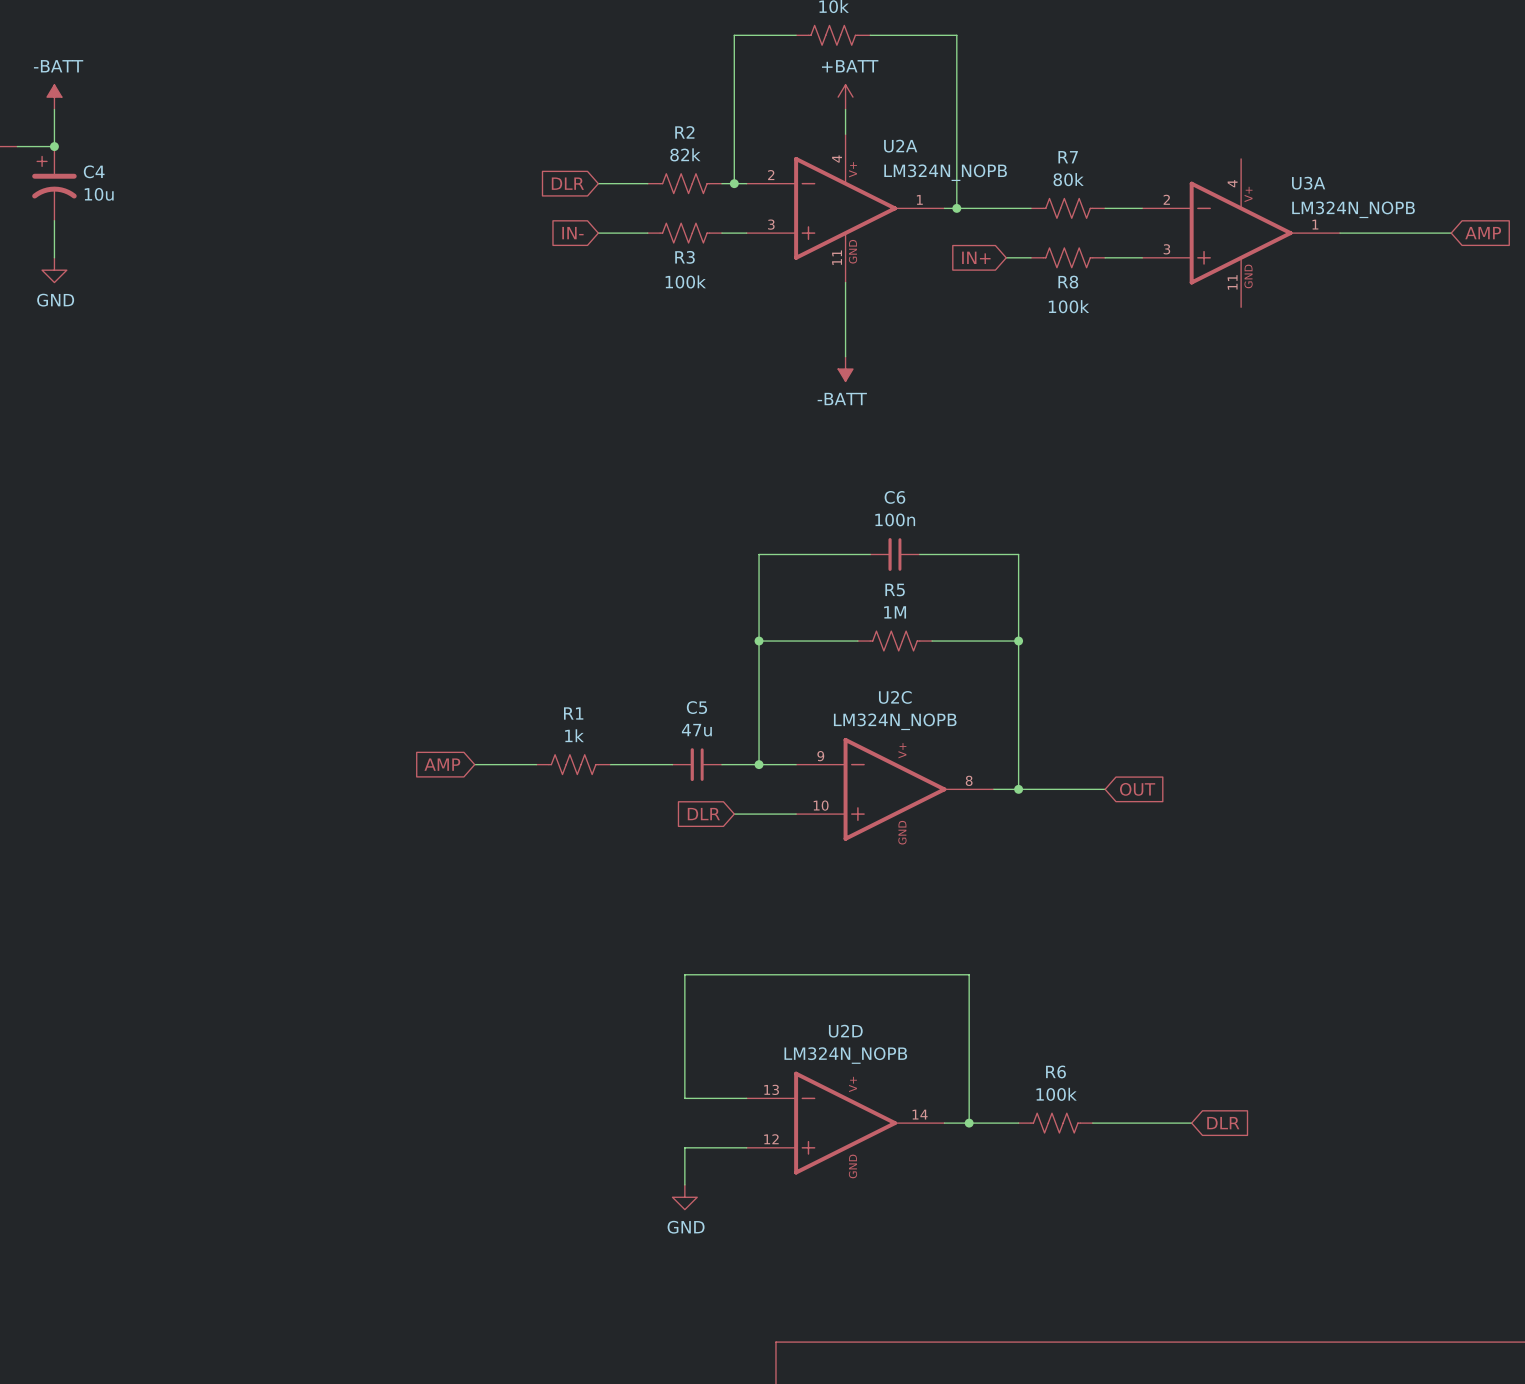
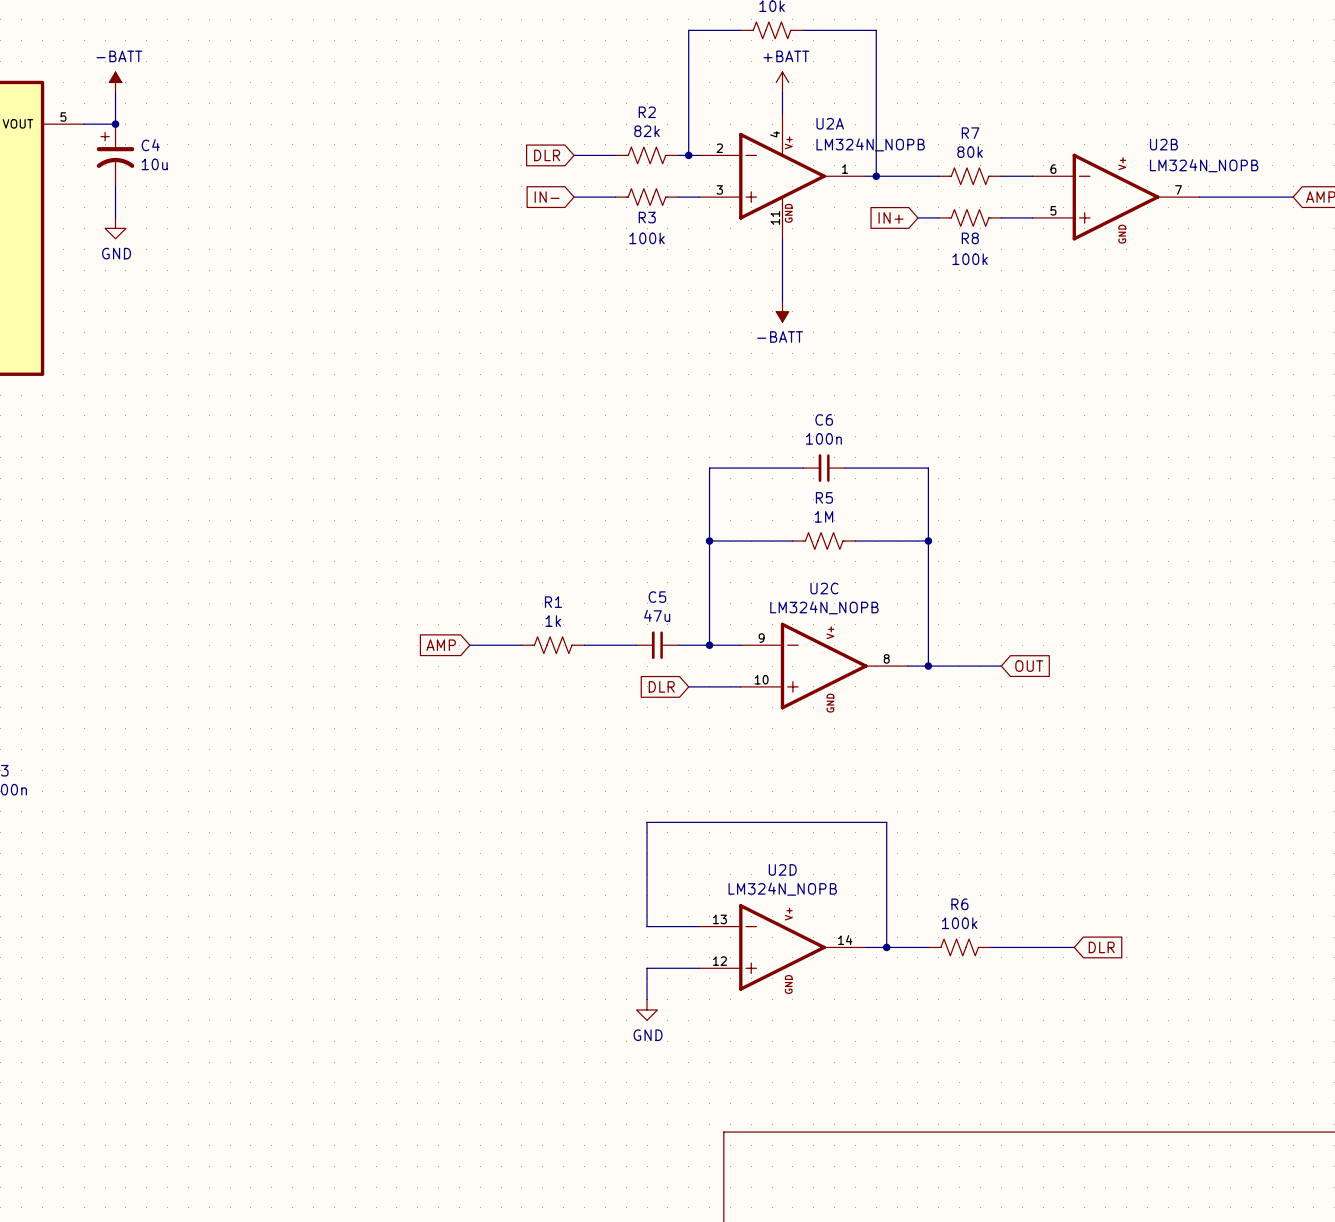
U3A: LM324N_NOPB (1241, 233) -> none
U2B: none -> LM324N_NOPB (1115, 197)

